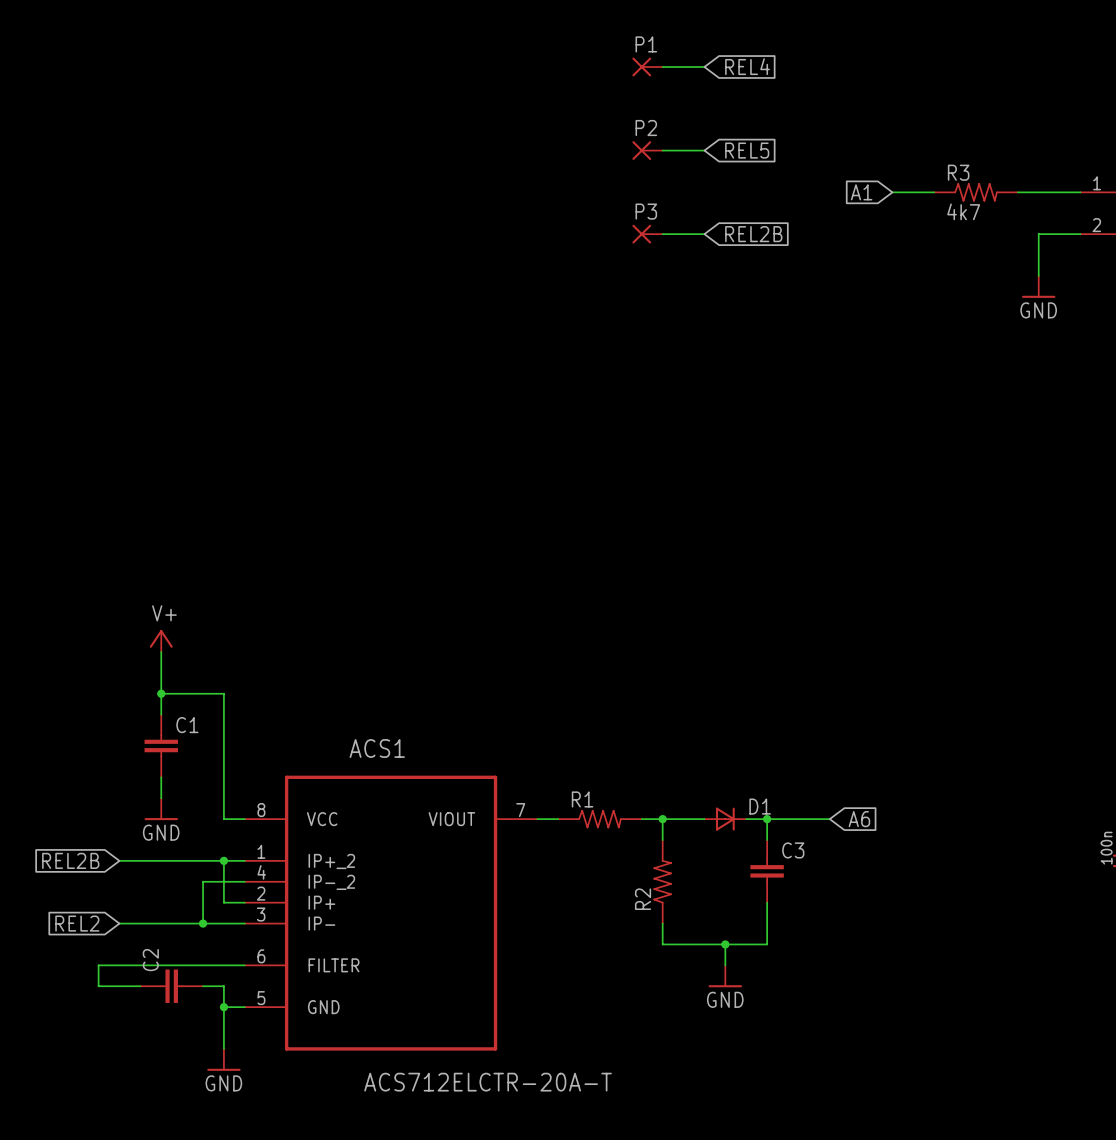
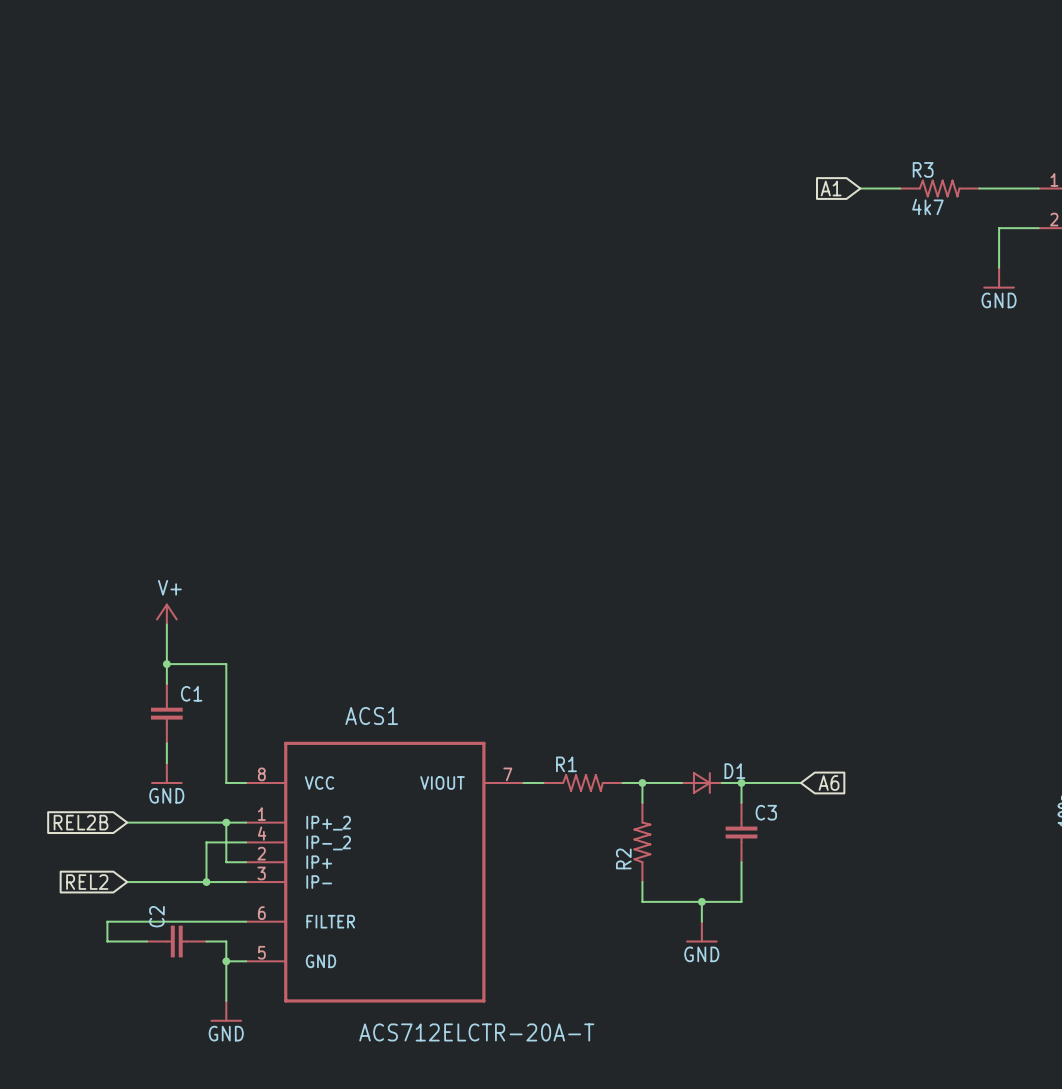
global label: REL4 (747, 66) -> none
P1: (647, 67) -> none
wire: (662, 67) (704, 67) -> none
P2: (647, 150) -> none
wire: (662, 150) (704, 150) -> none
global label: REL5 (747, 150) -> none
P3: (647, 234) -> none
wire: (662, 234) (704, 234) -> none
global label: REL2B (753, 234) -> none

